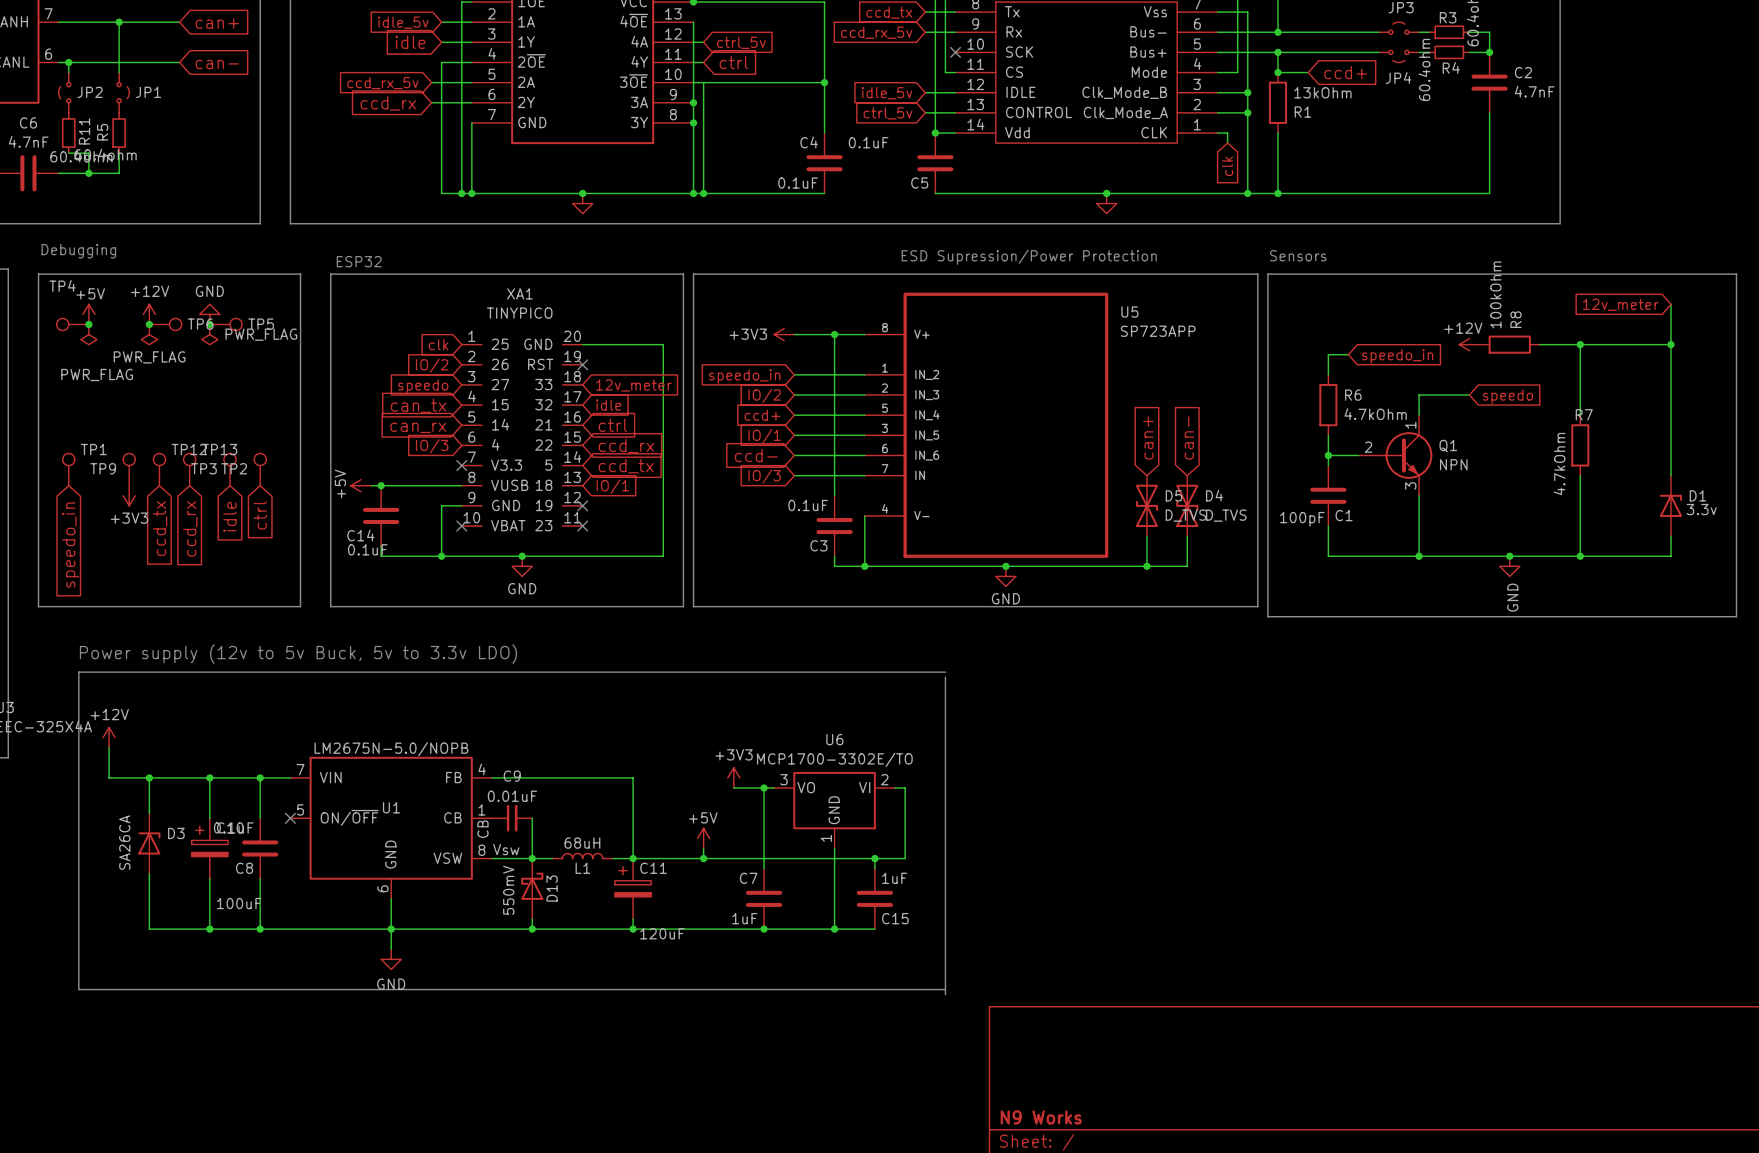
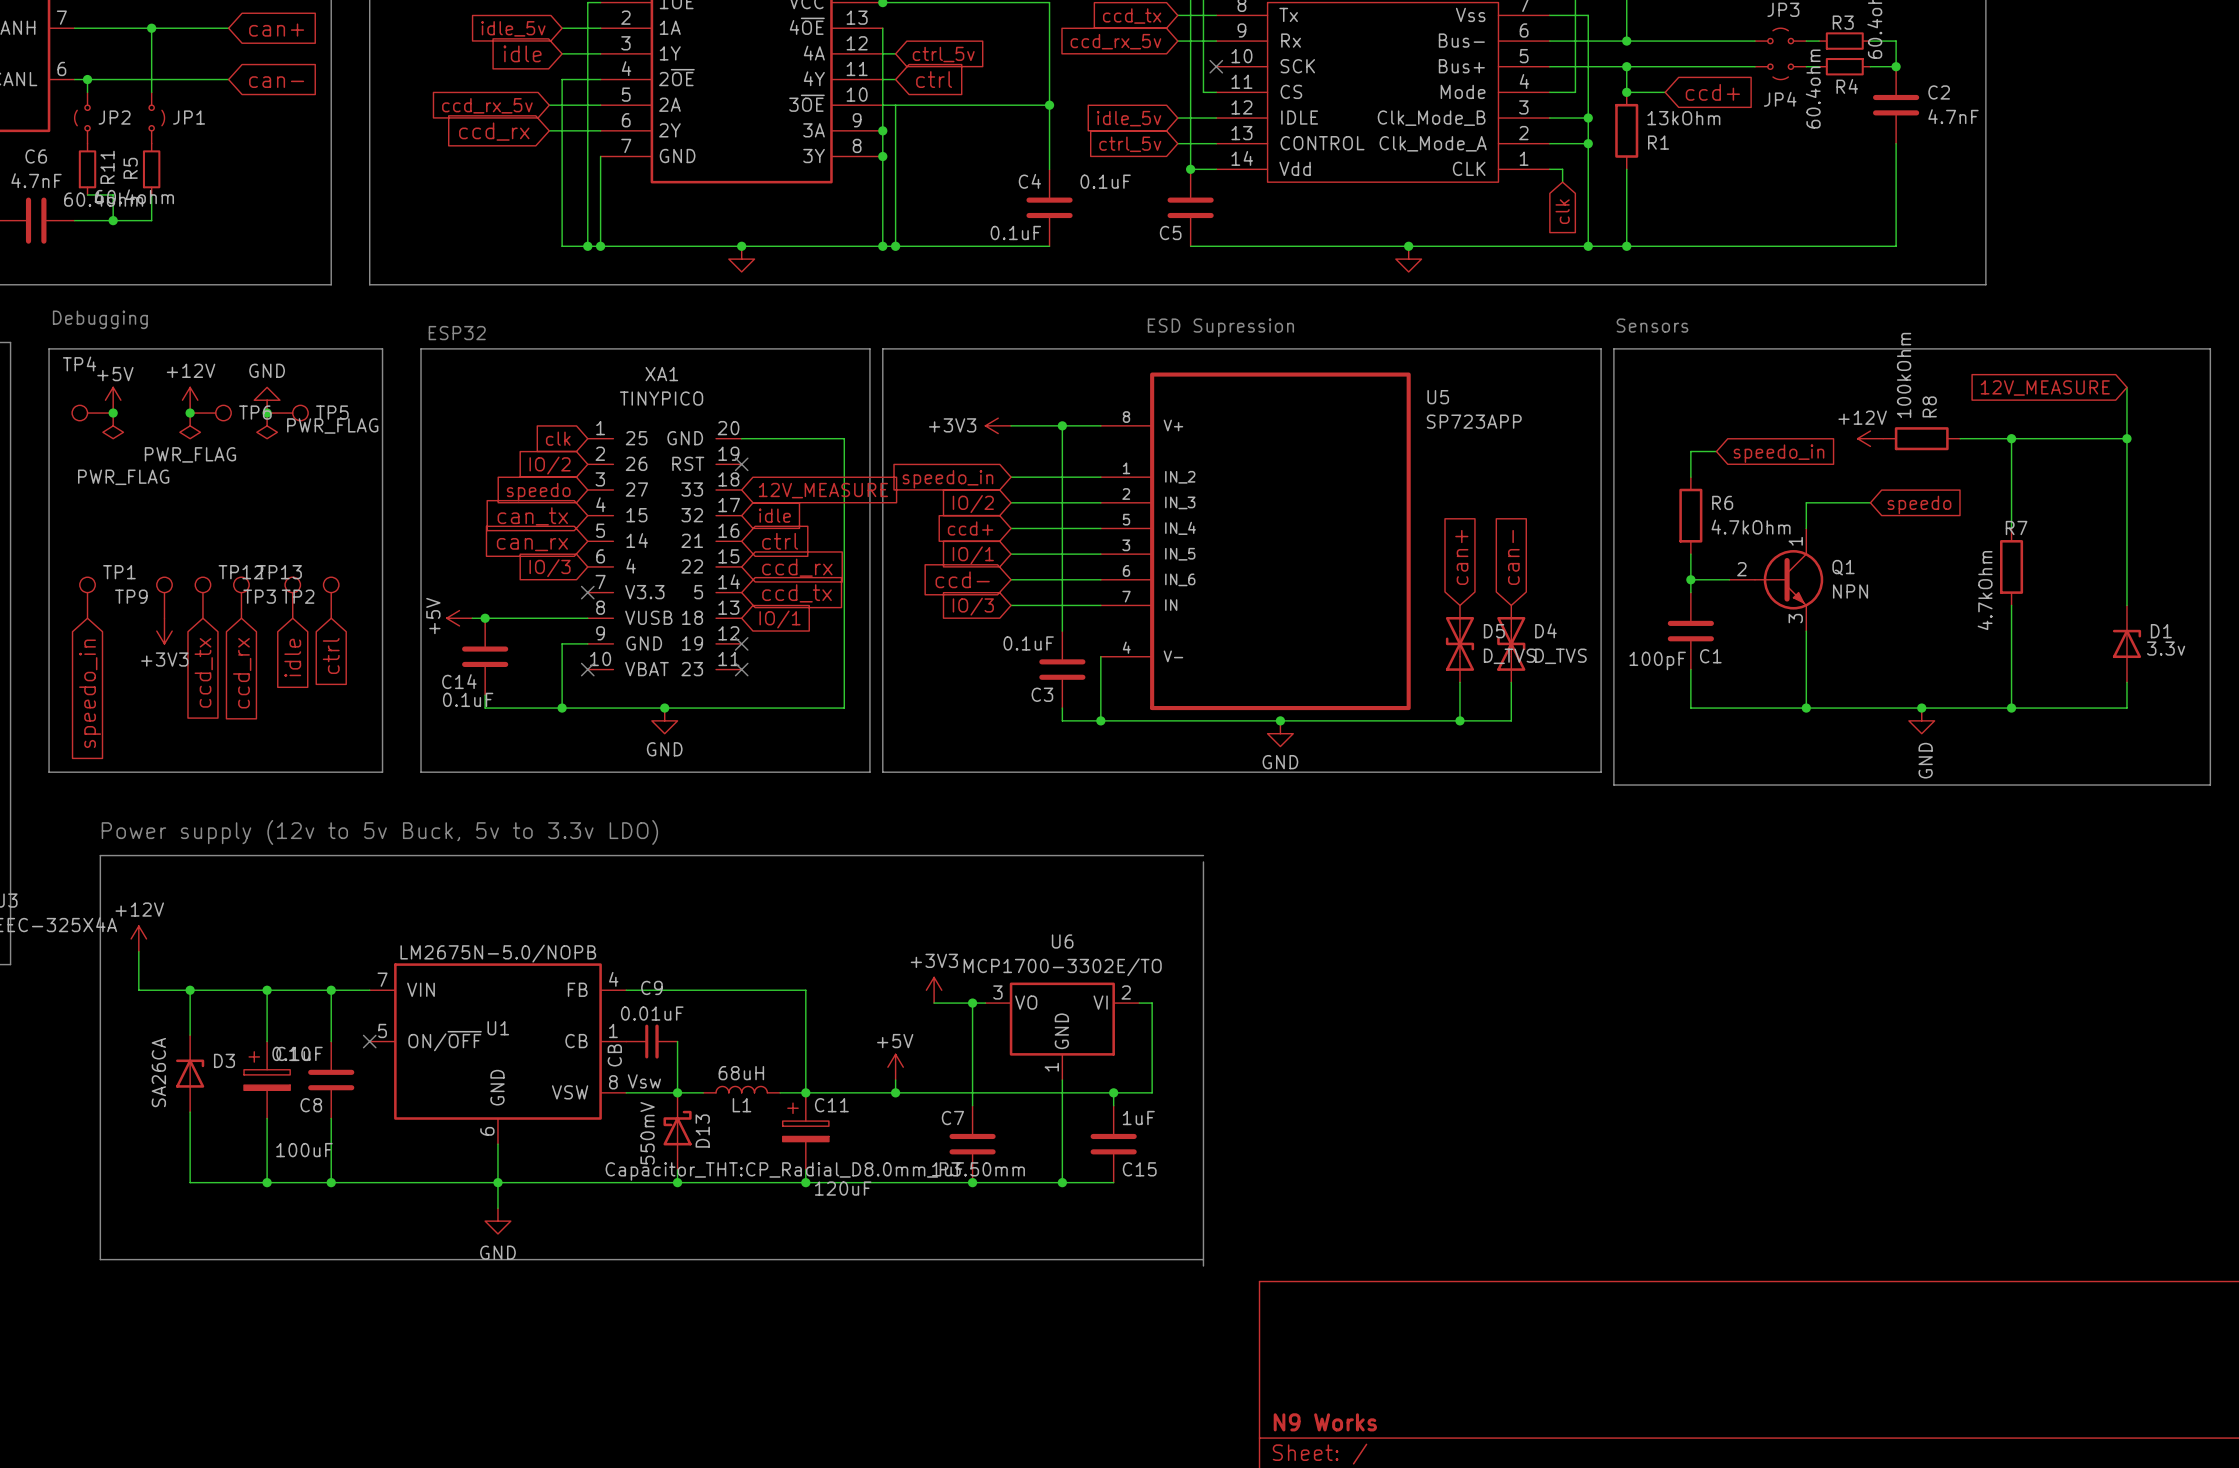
text: ESD Supression/Power Protection (1029, 257) -> ESD Supression (1220, 327)
global label: 12v_meter (1620, 304) -> 12V_MEASURE (2045, 387)
global label: 12v_meter (633, 385) -> 12V_MEASURE (823, 490)
C11 text: none -> Capacitor_THT:CP_Radial_D8.0mm_P3.50mm (815, 1171)

